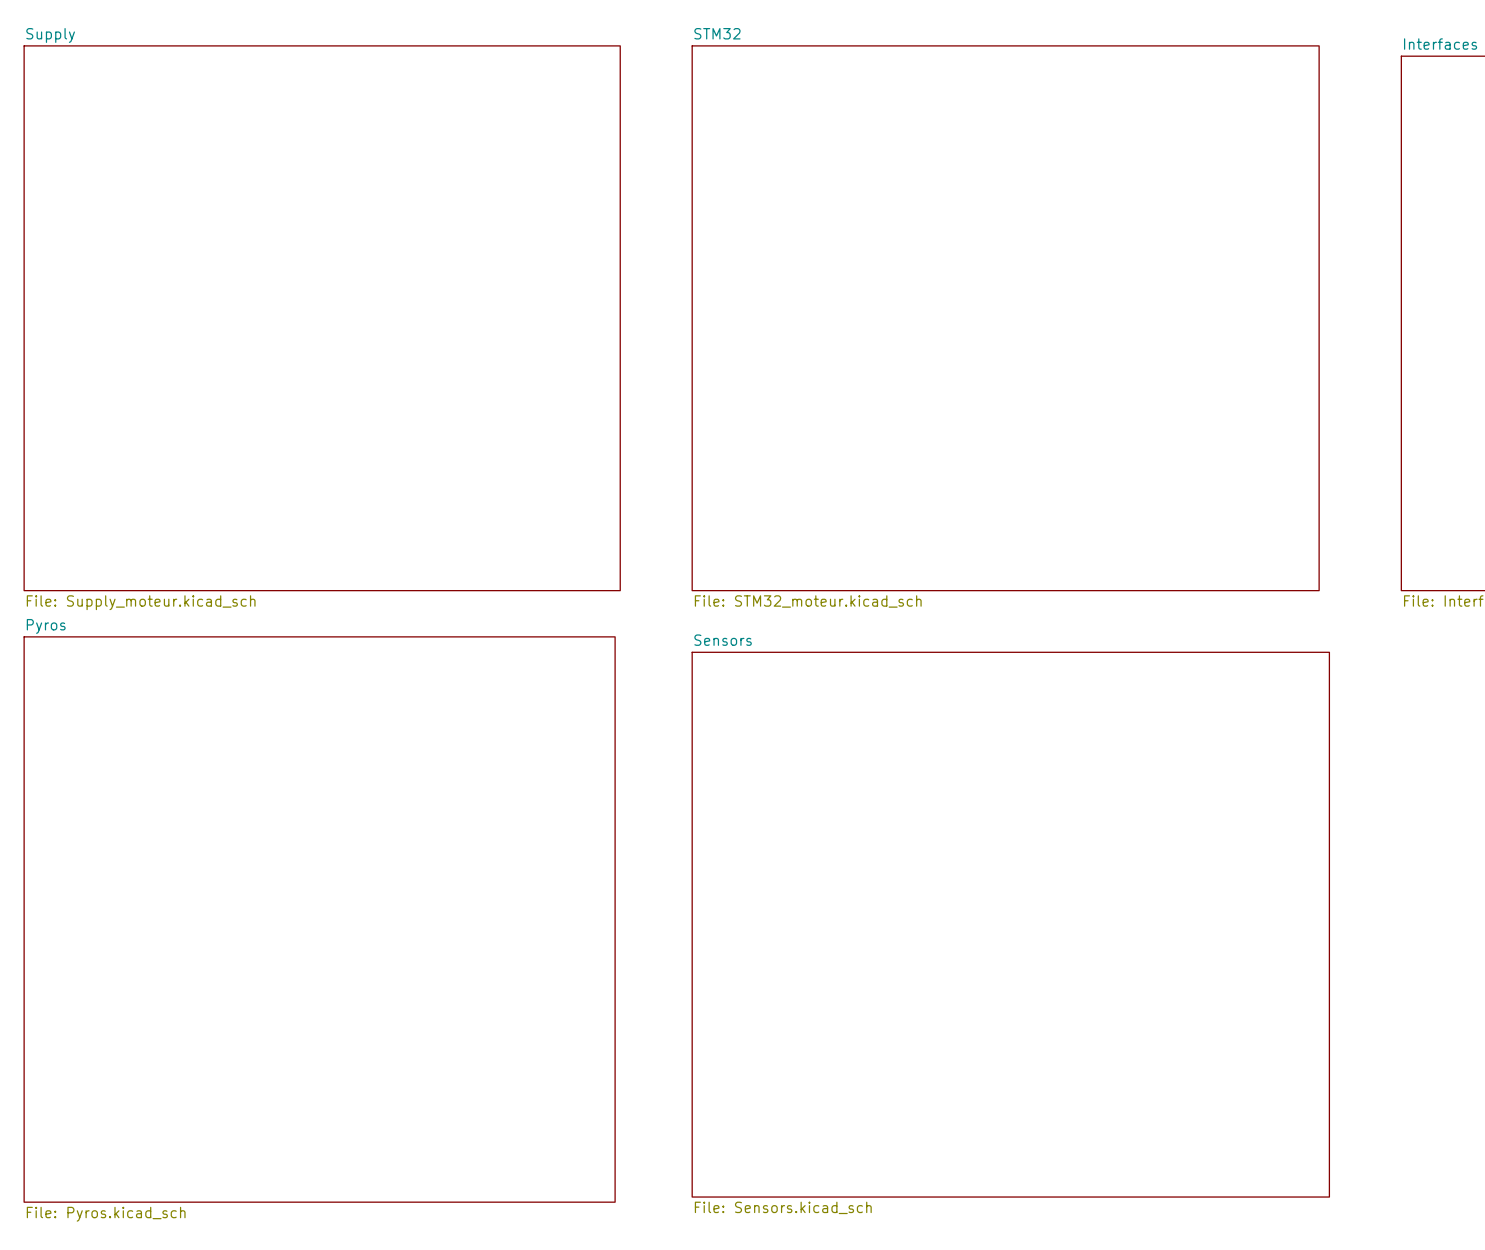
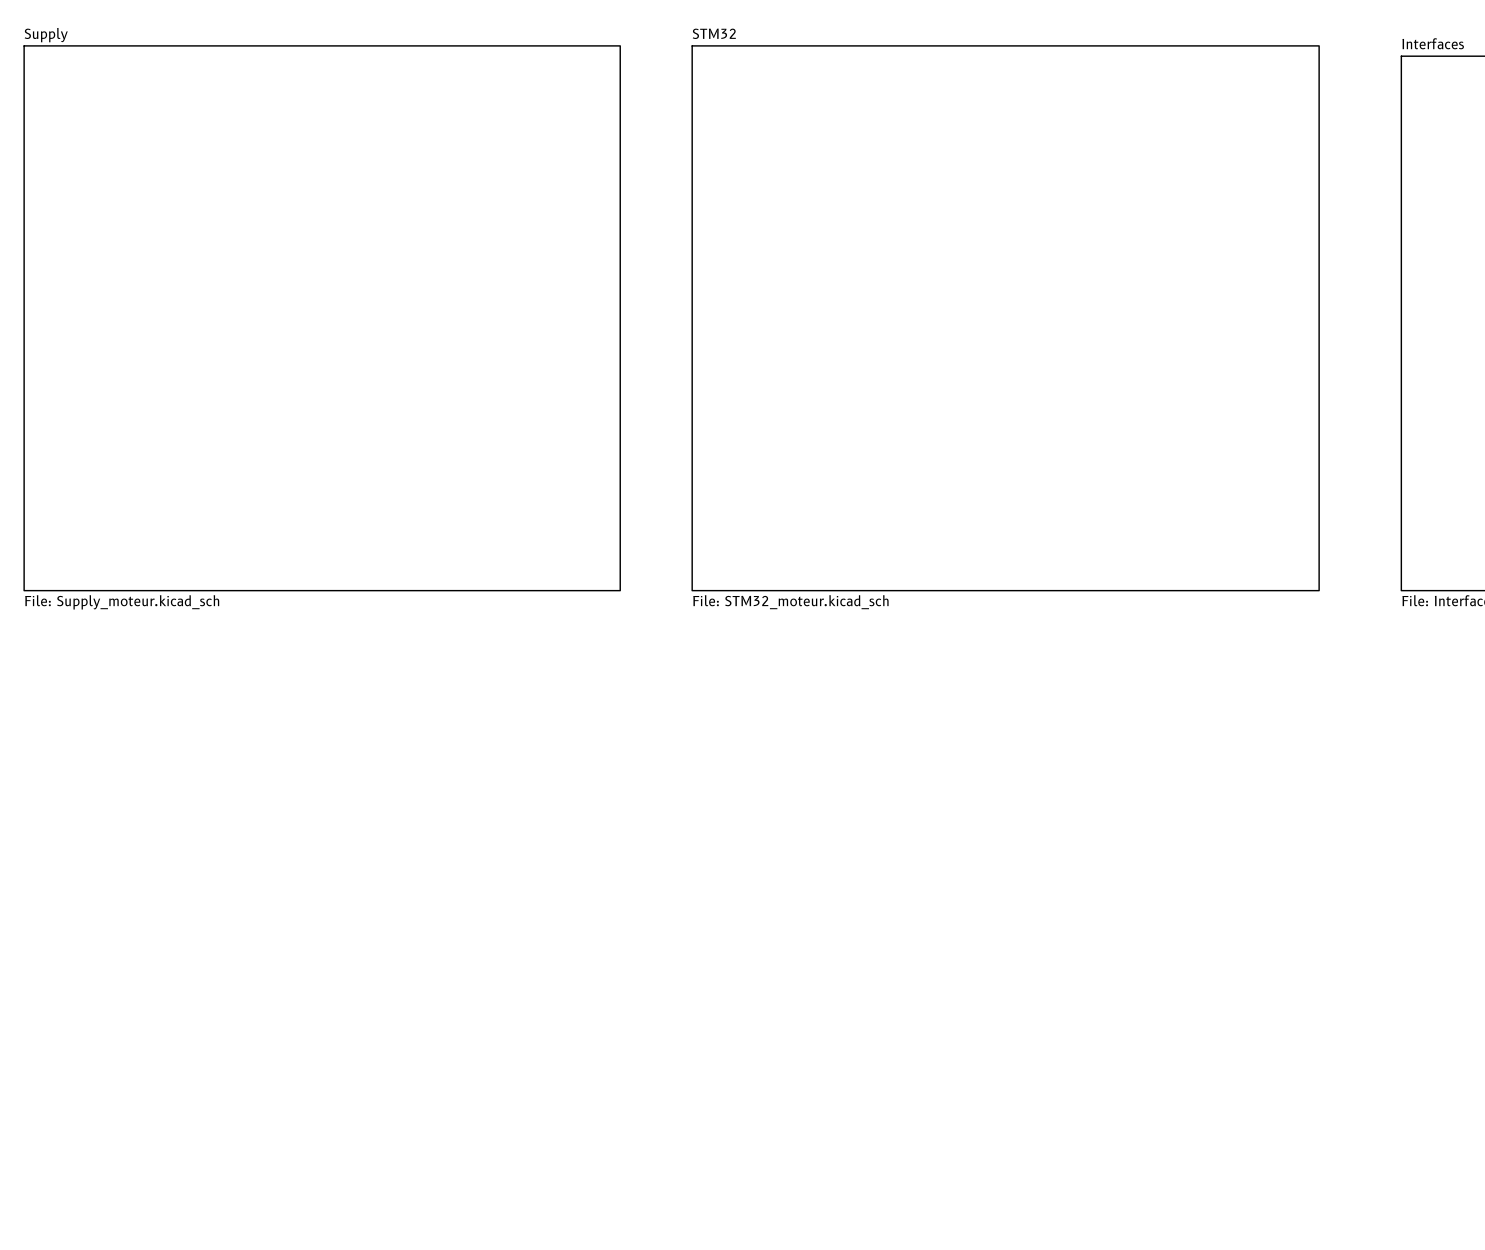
sheet Pyros: File: Pyros.kicad_sch (319, 919) -> none
sheet Sensors: File: Sensors.kicad_sch (1010, 924) -> none

